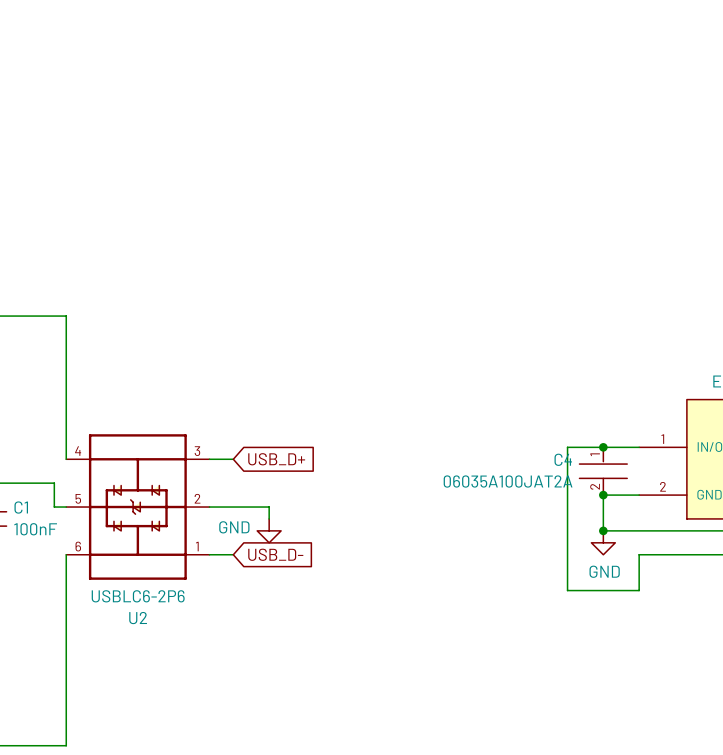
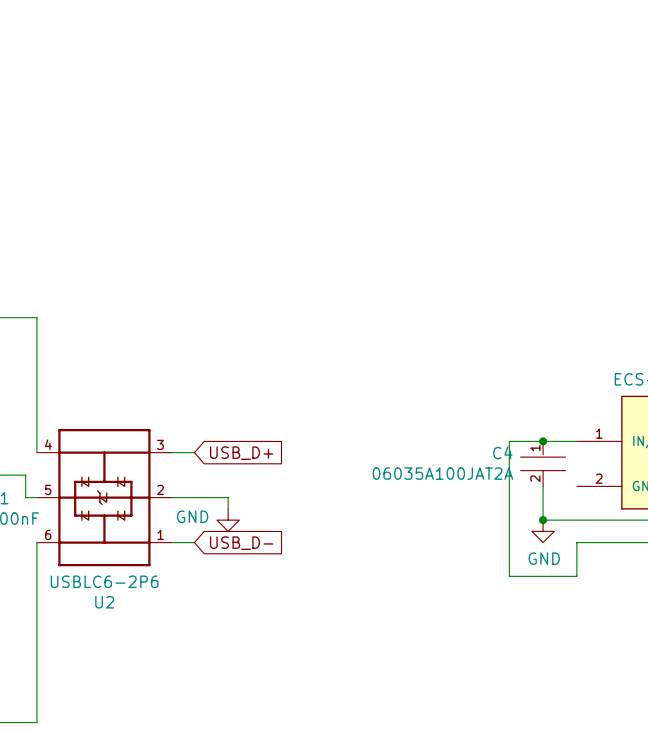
wire: (603, 495) (639, 495) -> none
junction: (603, 495) -> none

